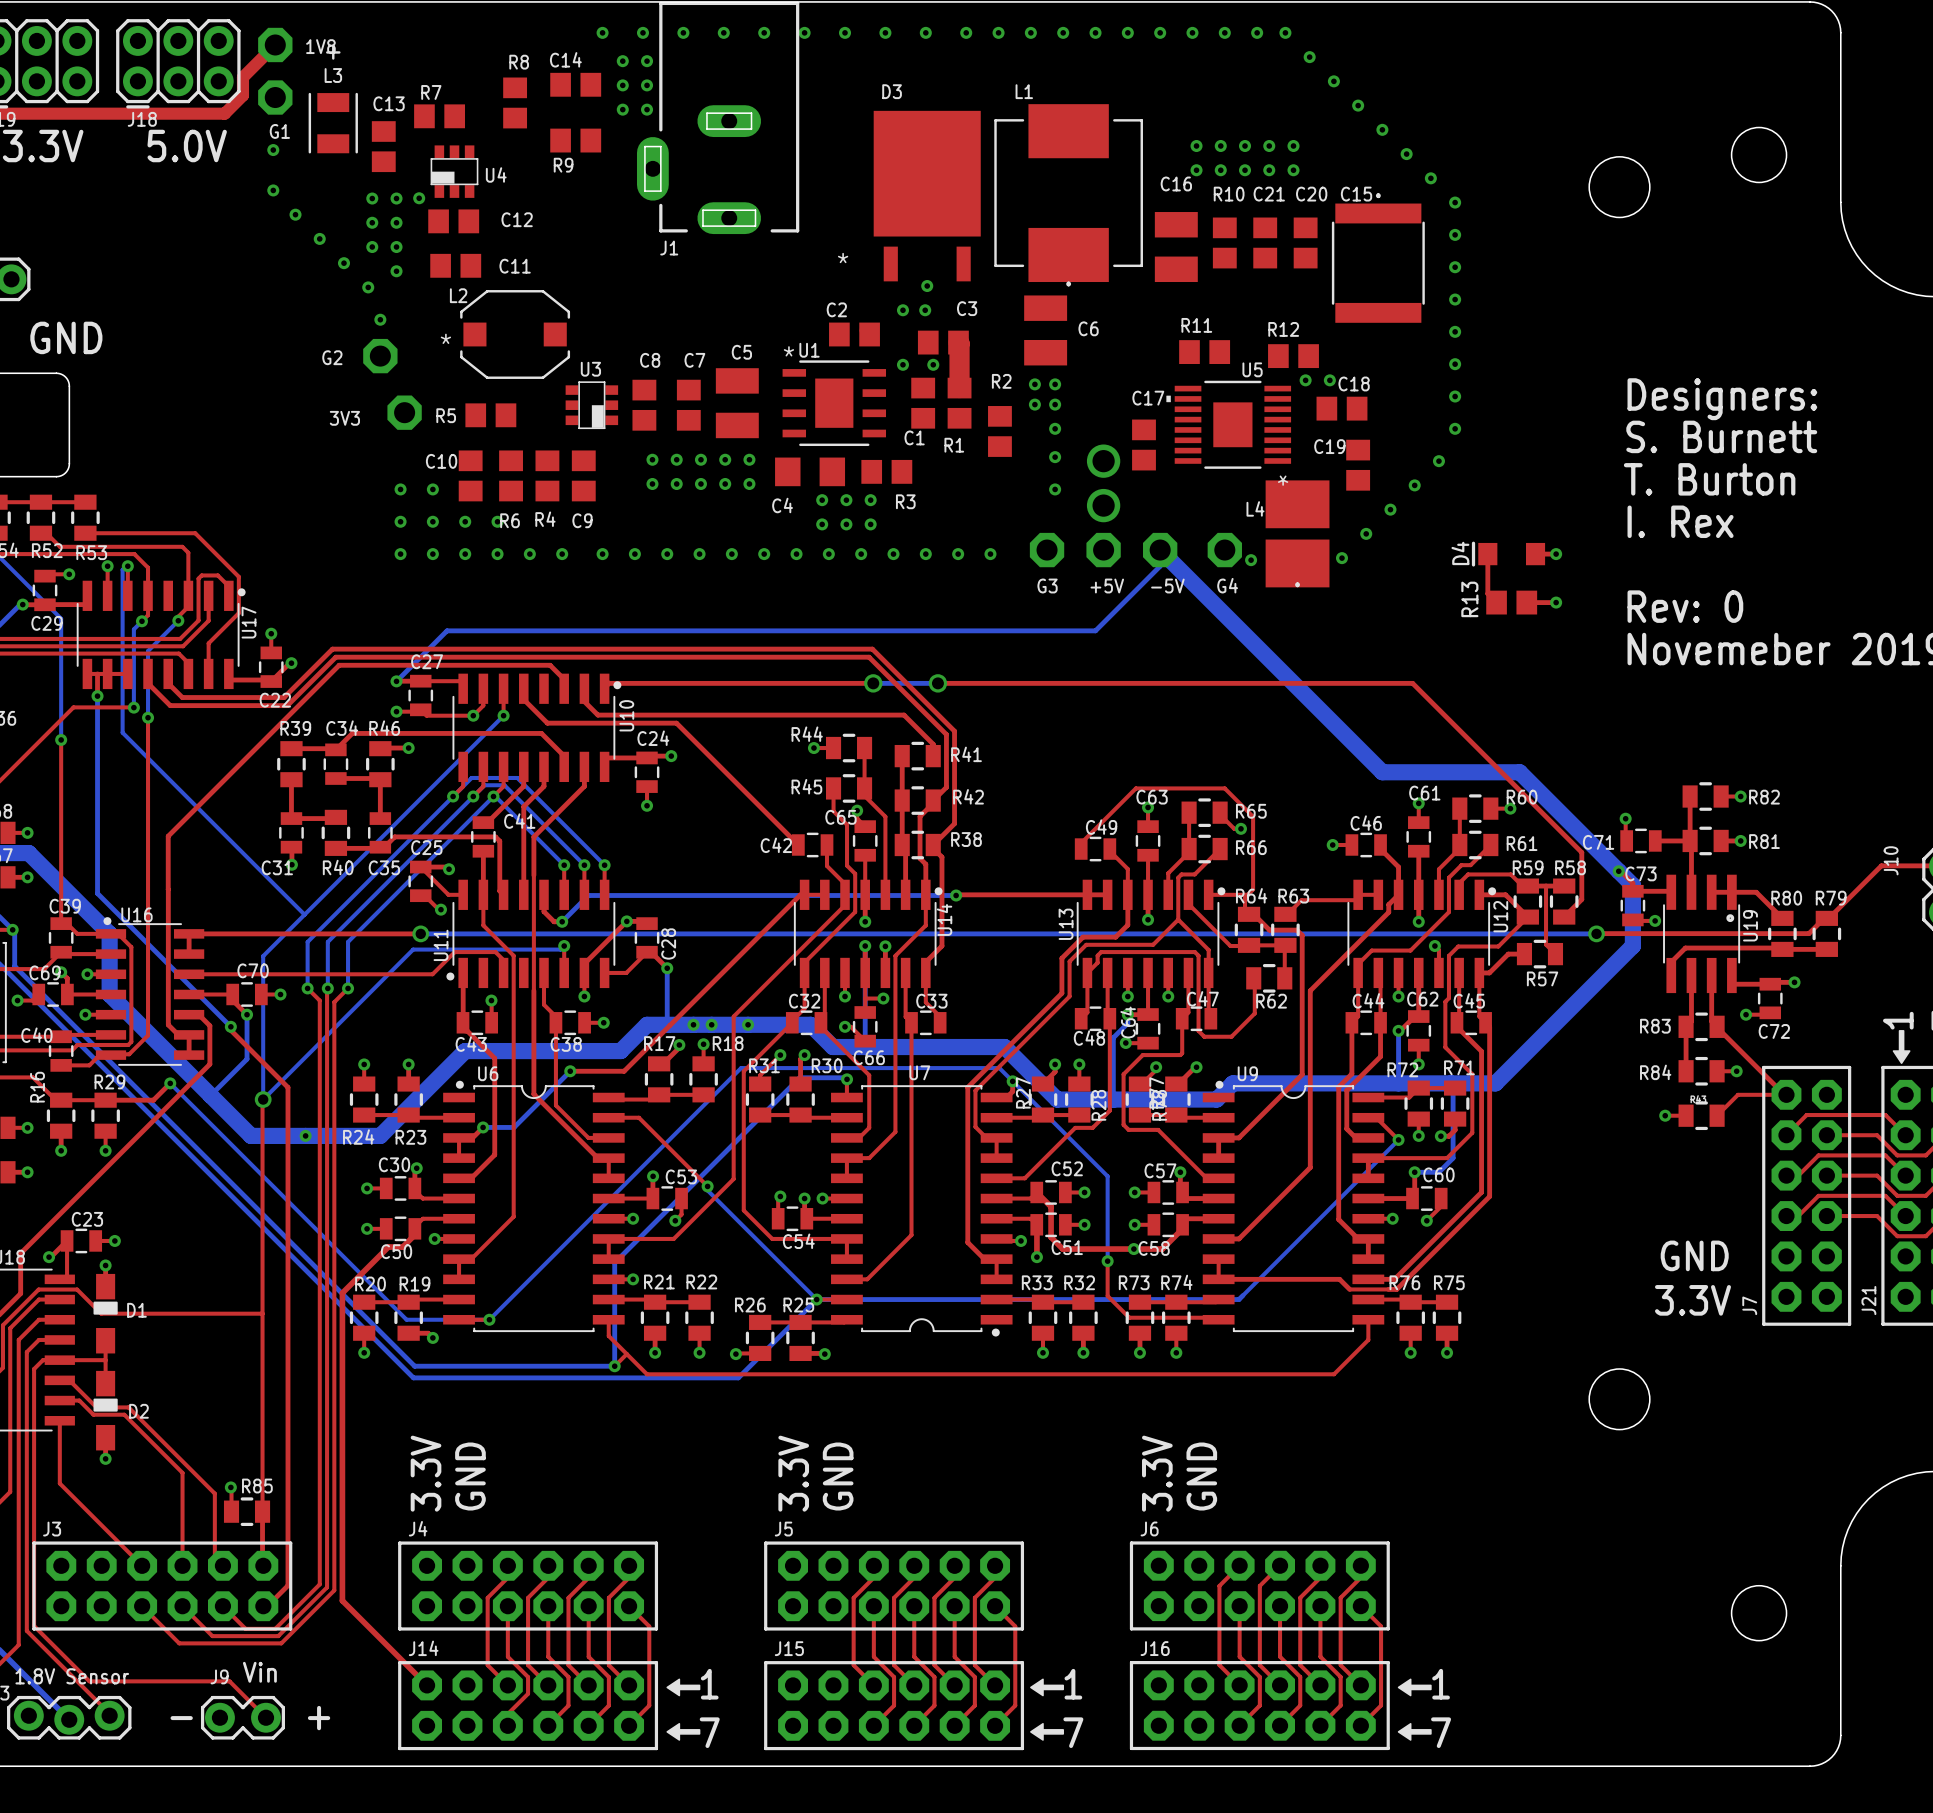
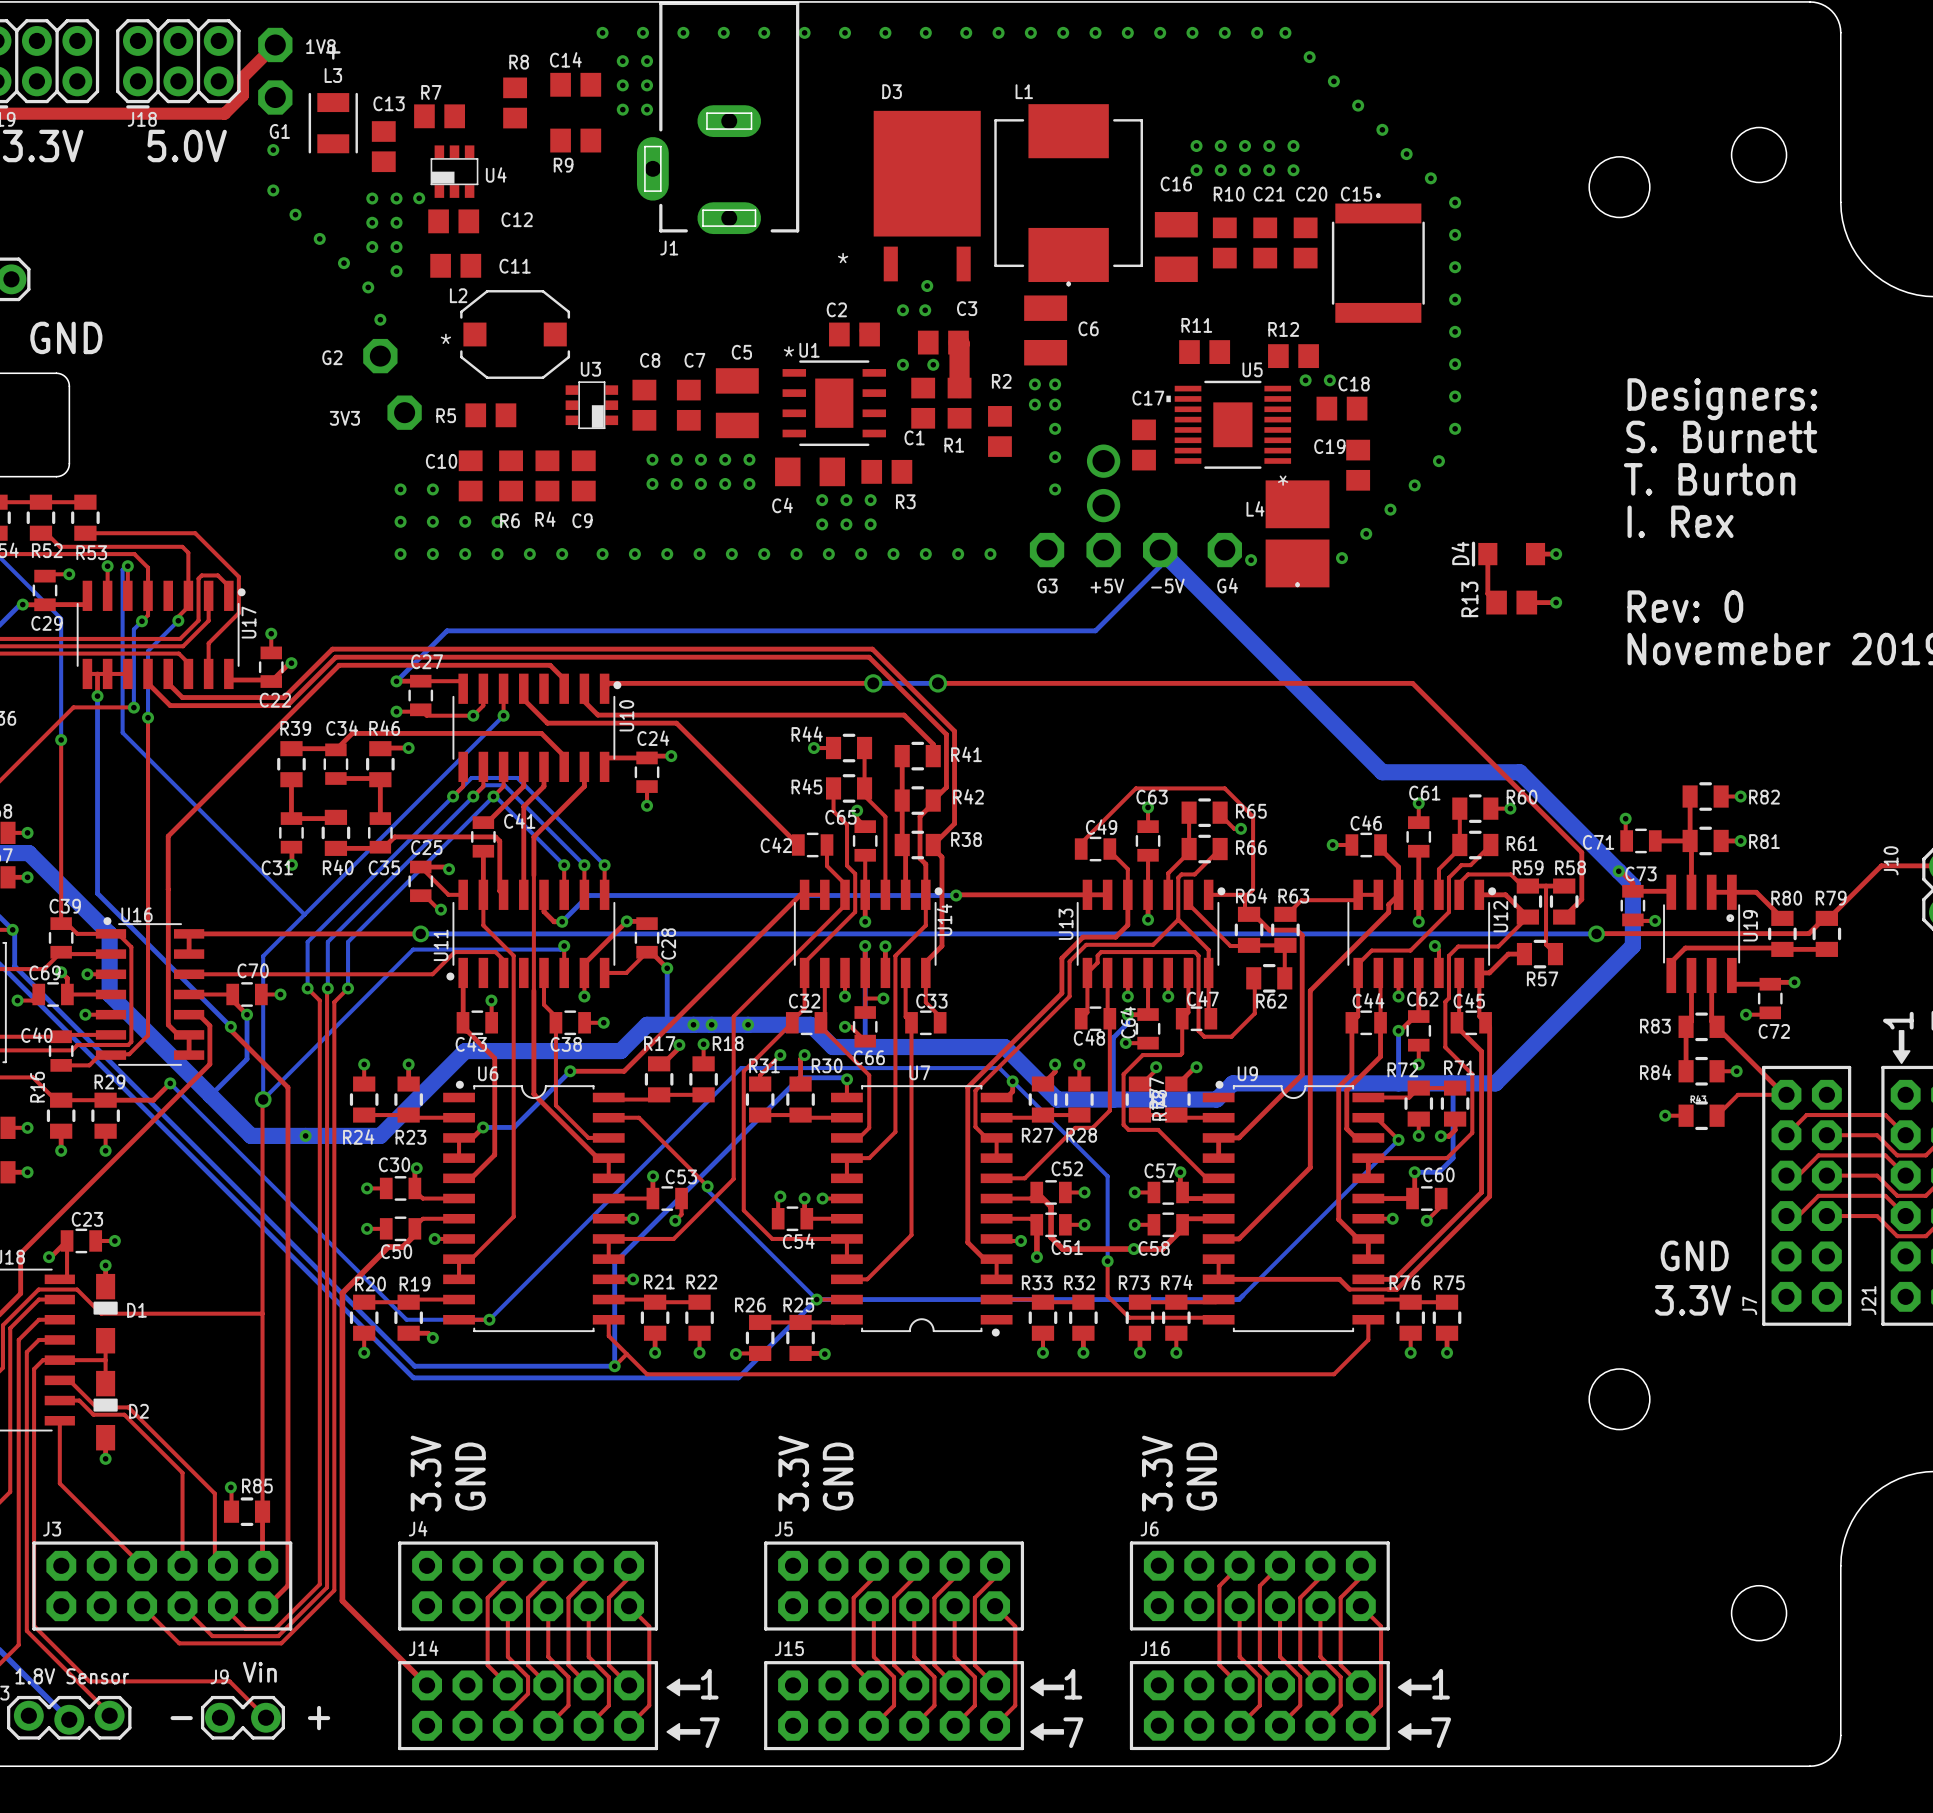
R27 name rotation: 0° (1023, 1092) -> 90° clockwise (1037, 1135)
R27 name position: R27 (1023, 1092) -> R27 (1037, 1135)
R28 name rotation: 0° (1098, 1105) -> 90° clockwise (1081, 1135)

